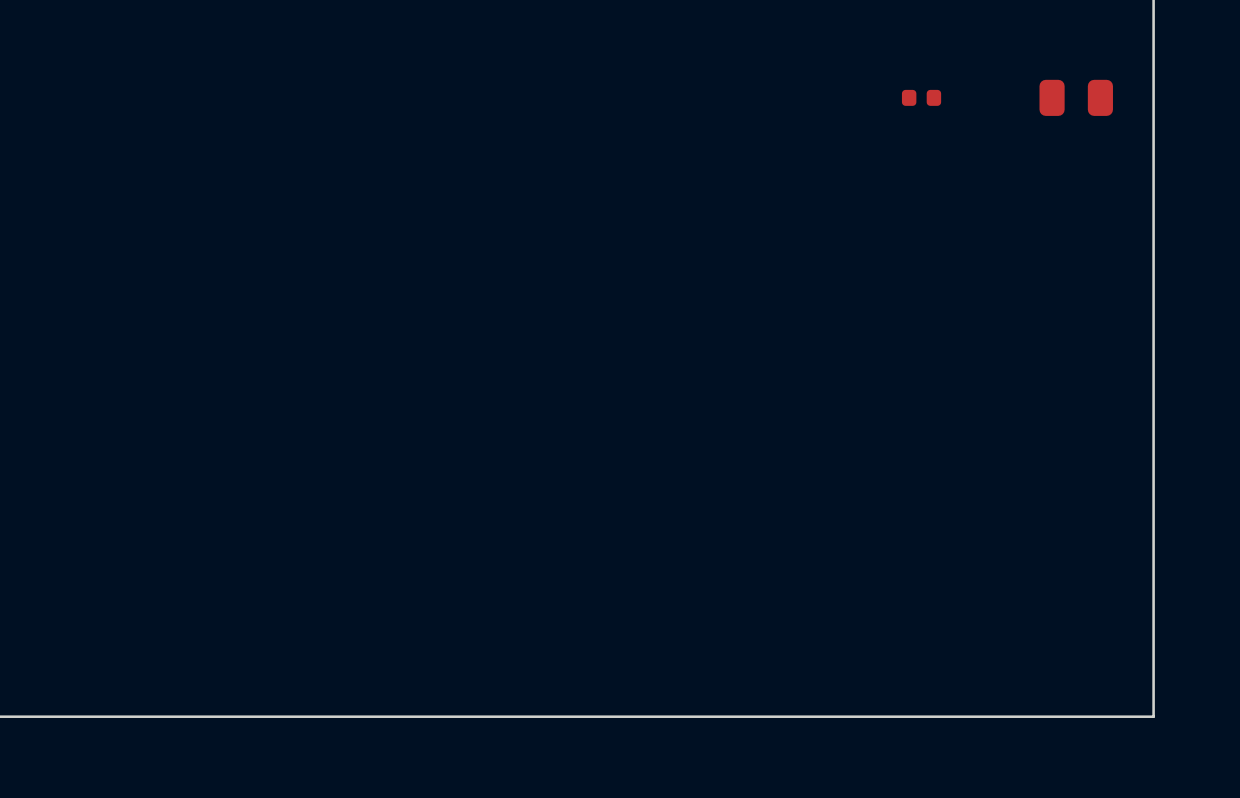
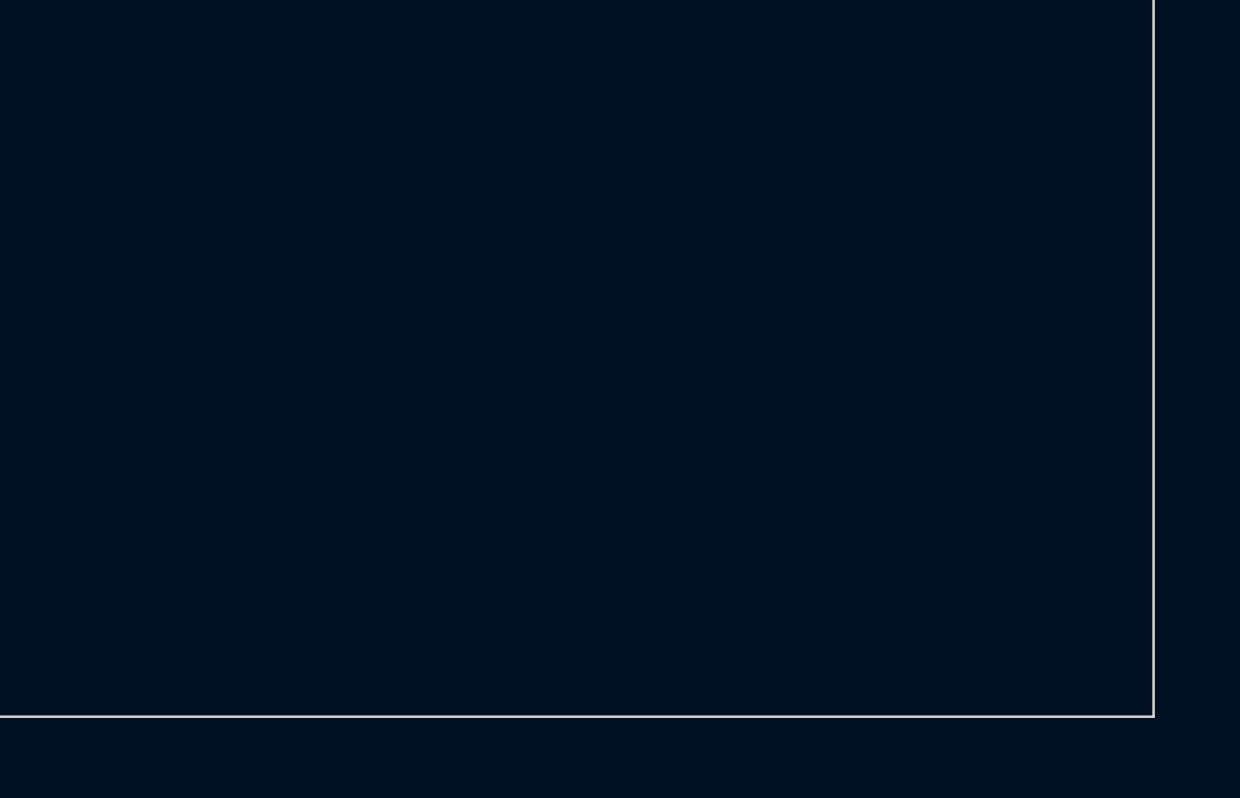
part: (921, 97) -> none
part: (1076, 97) -> none

